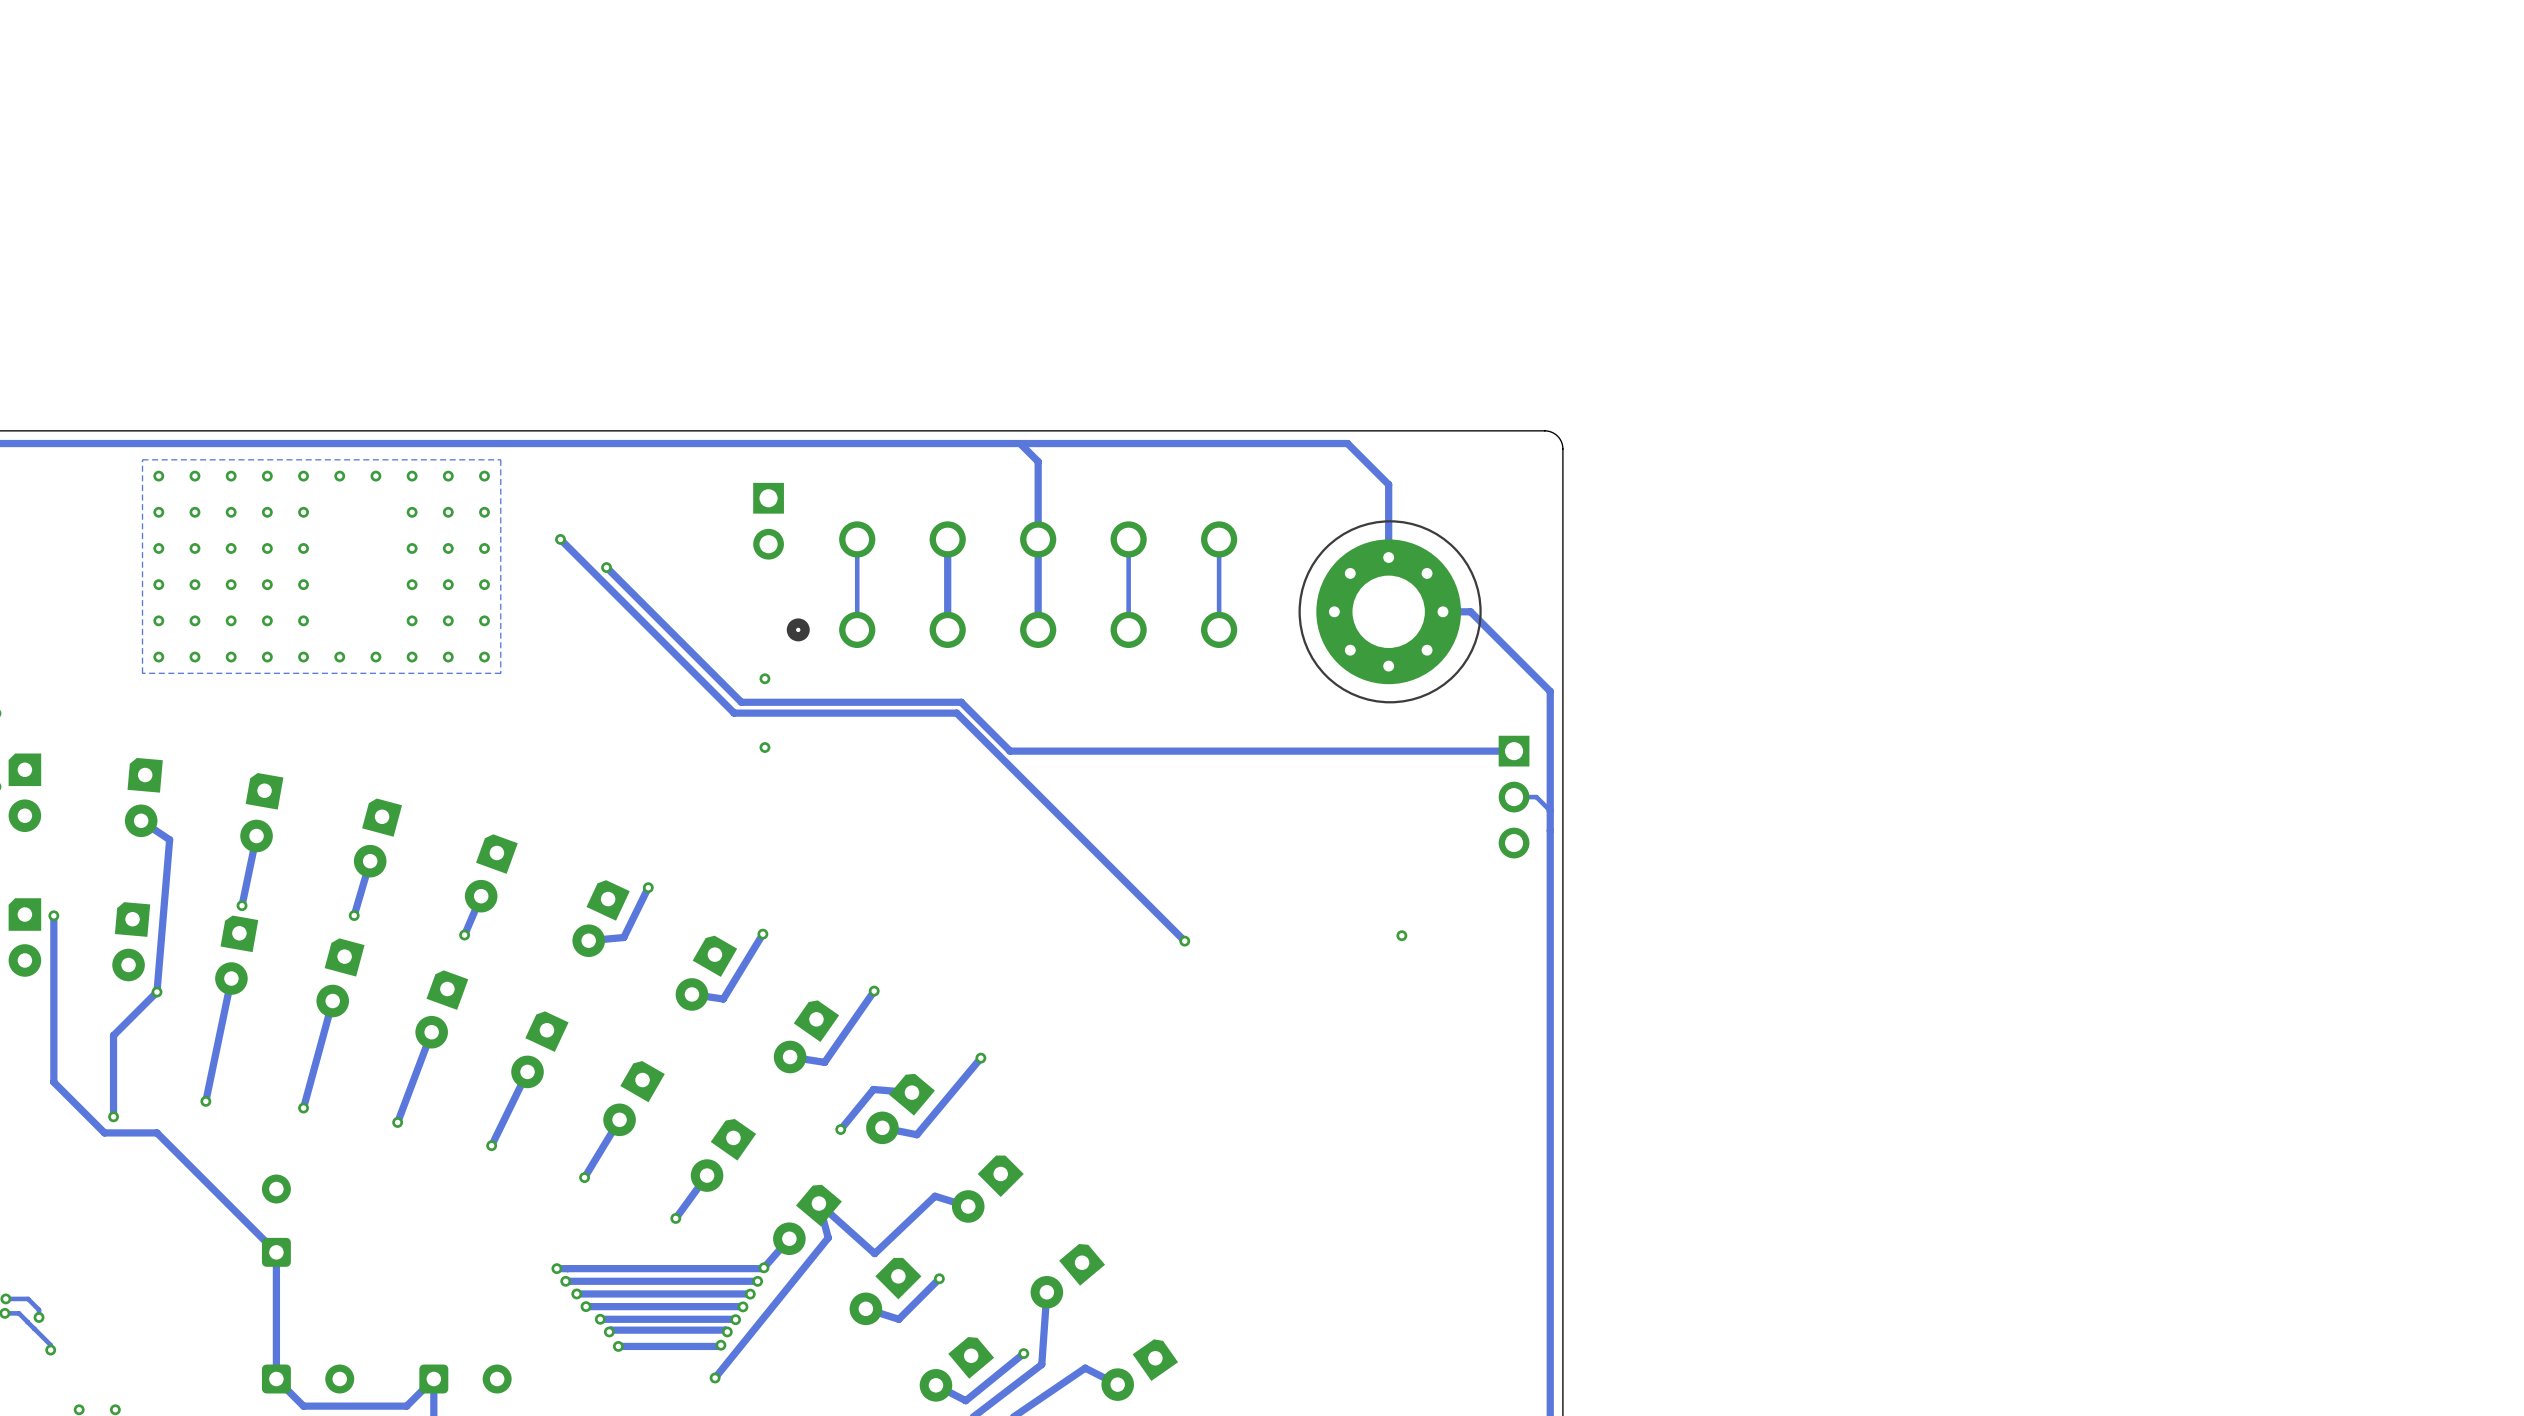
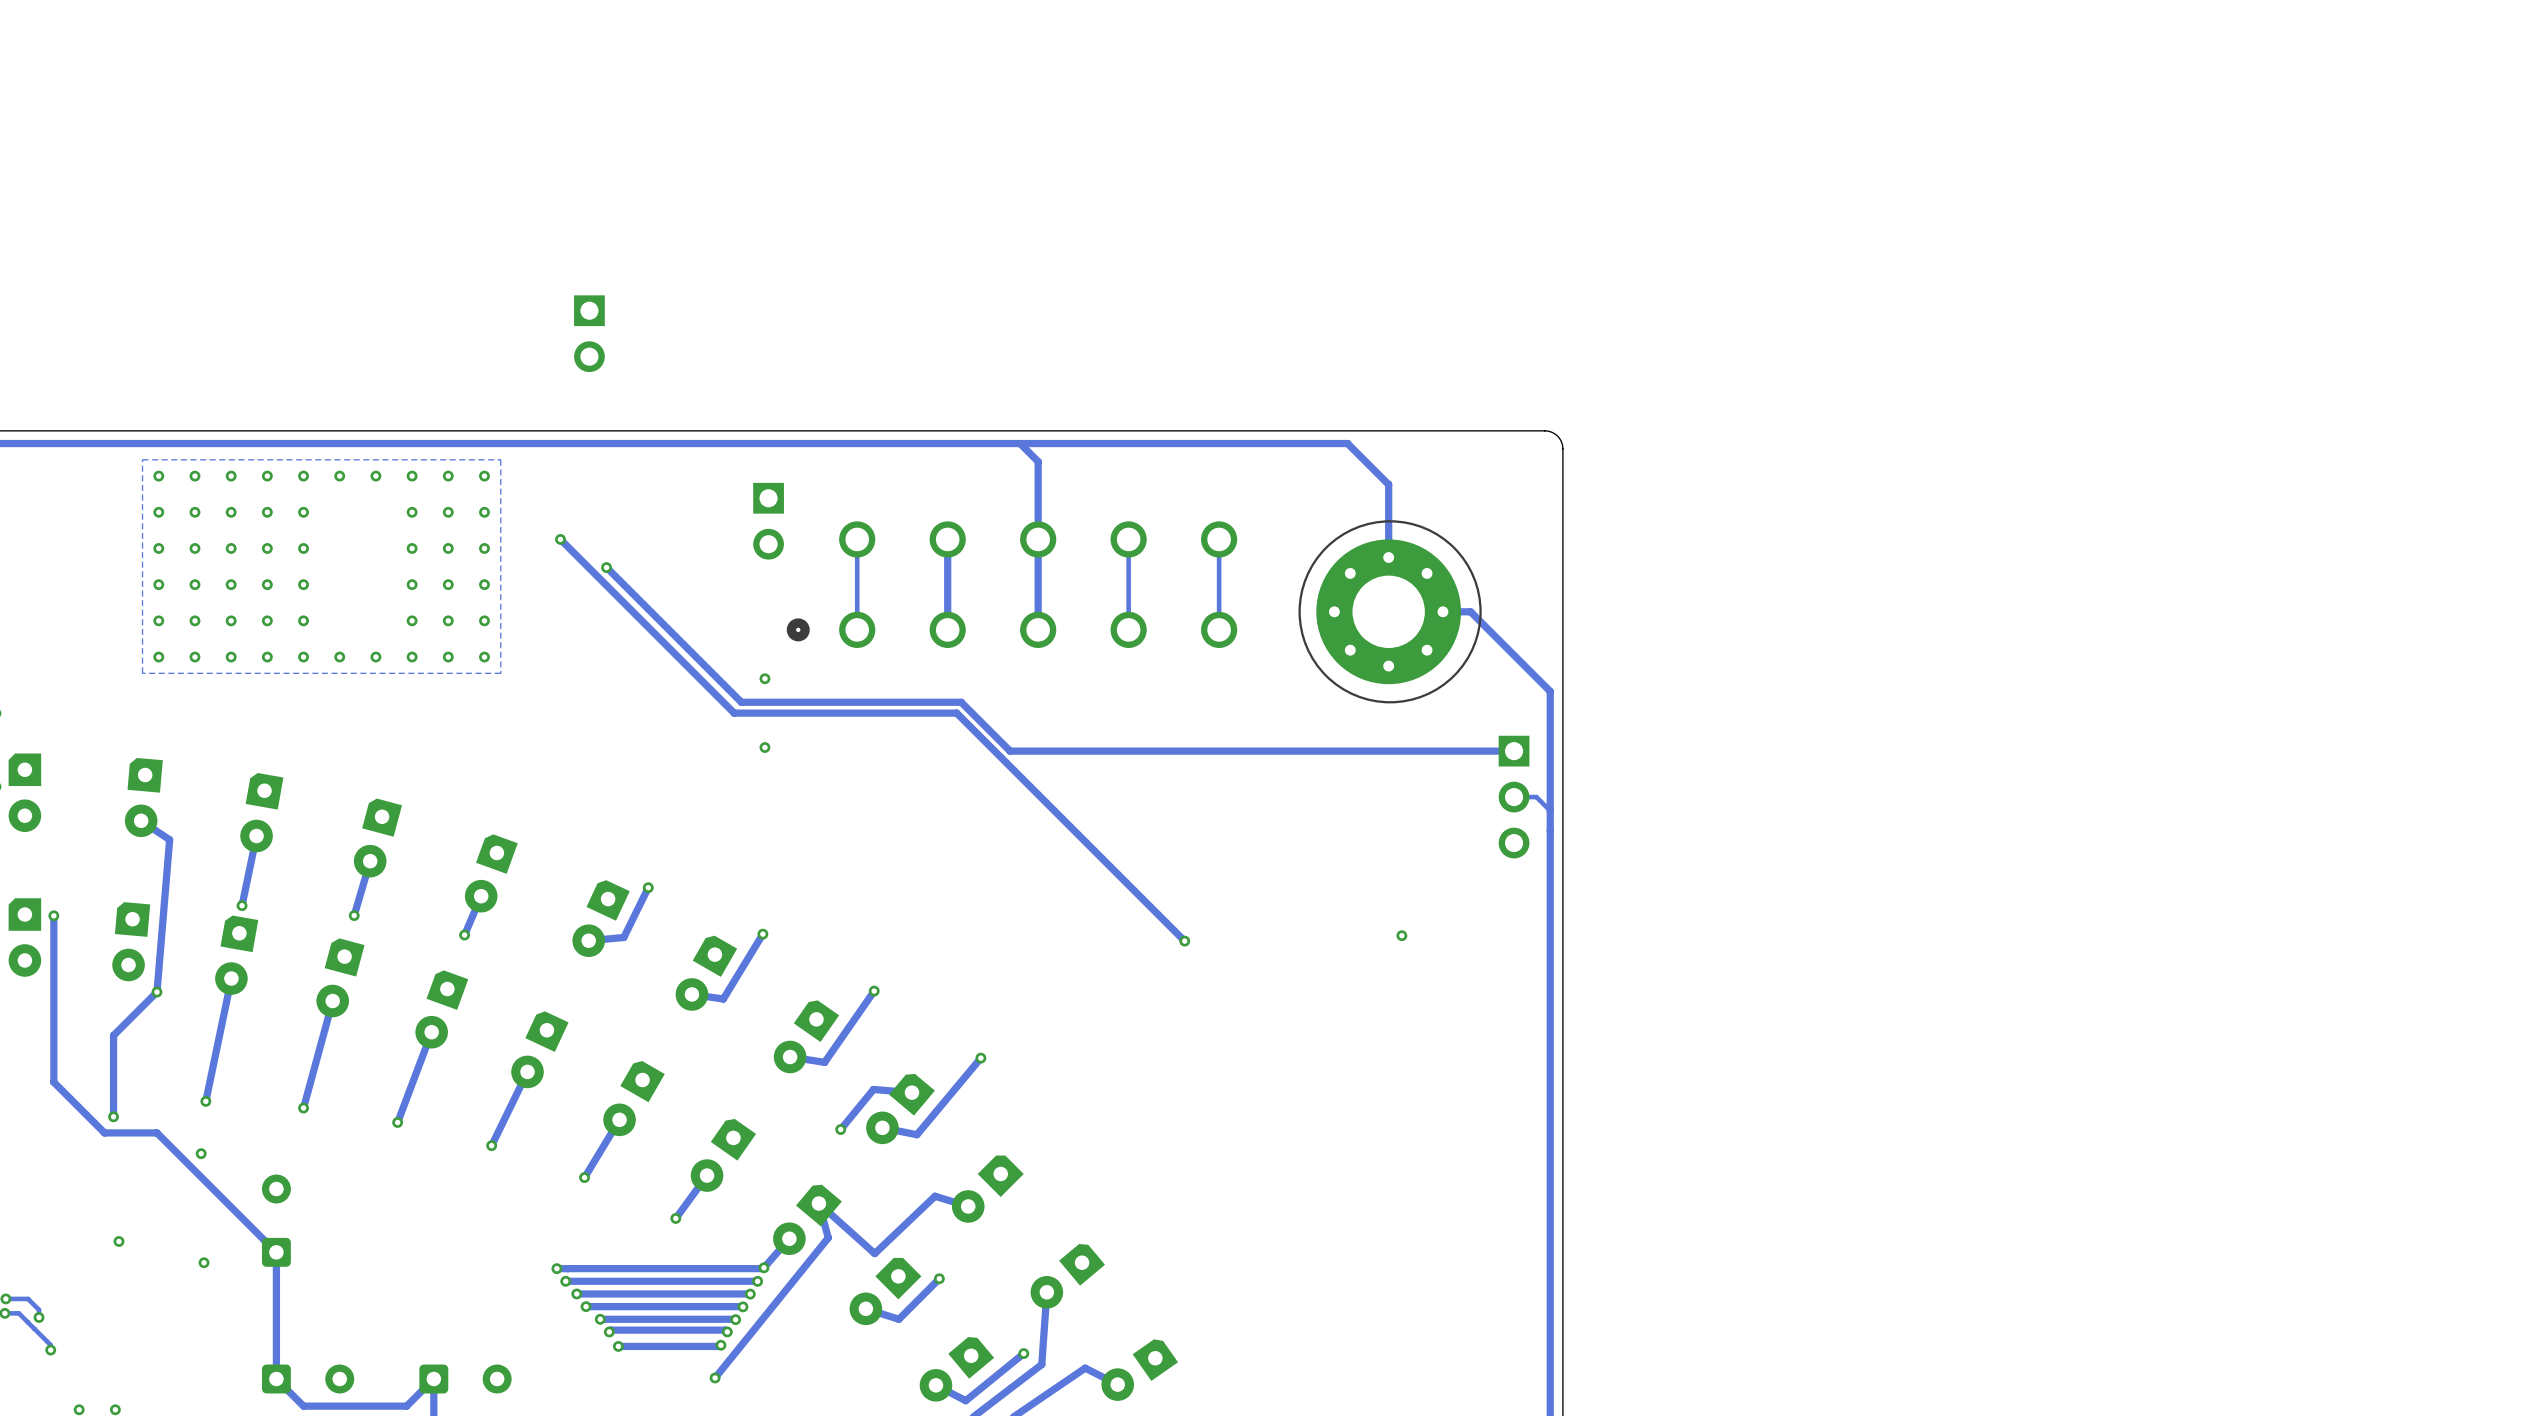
part: none -> (589, 333)
via: none -> (201, 1153)
via: none -> (118, 1241)
via: none -> (204, 1262)

